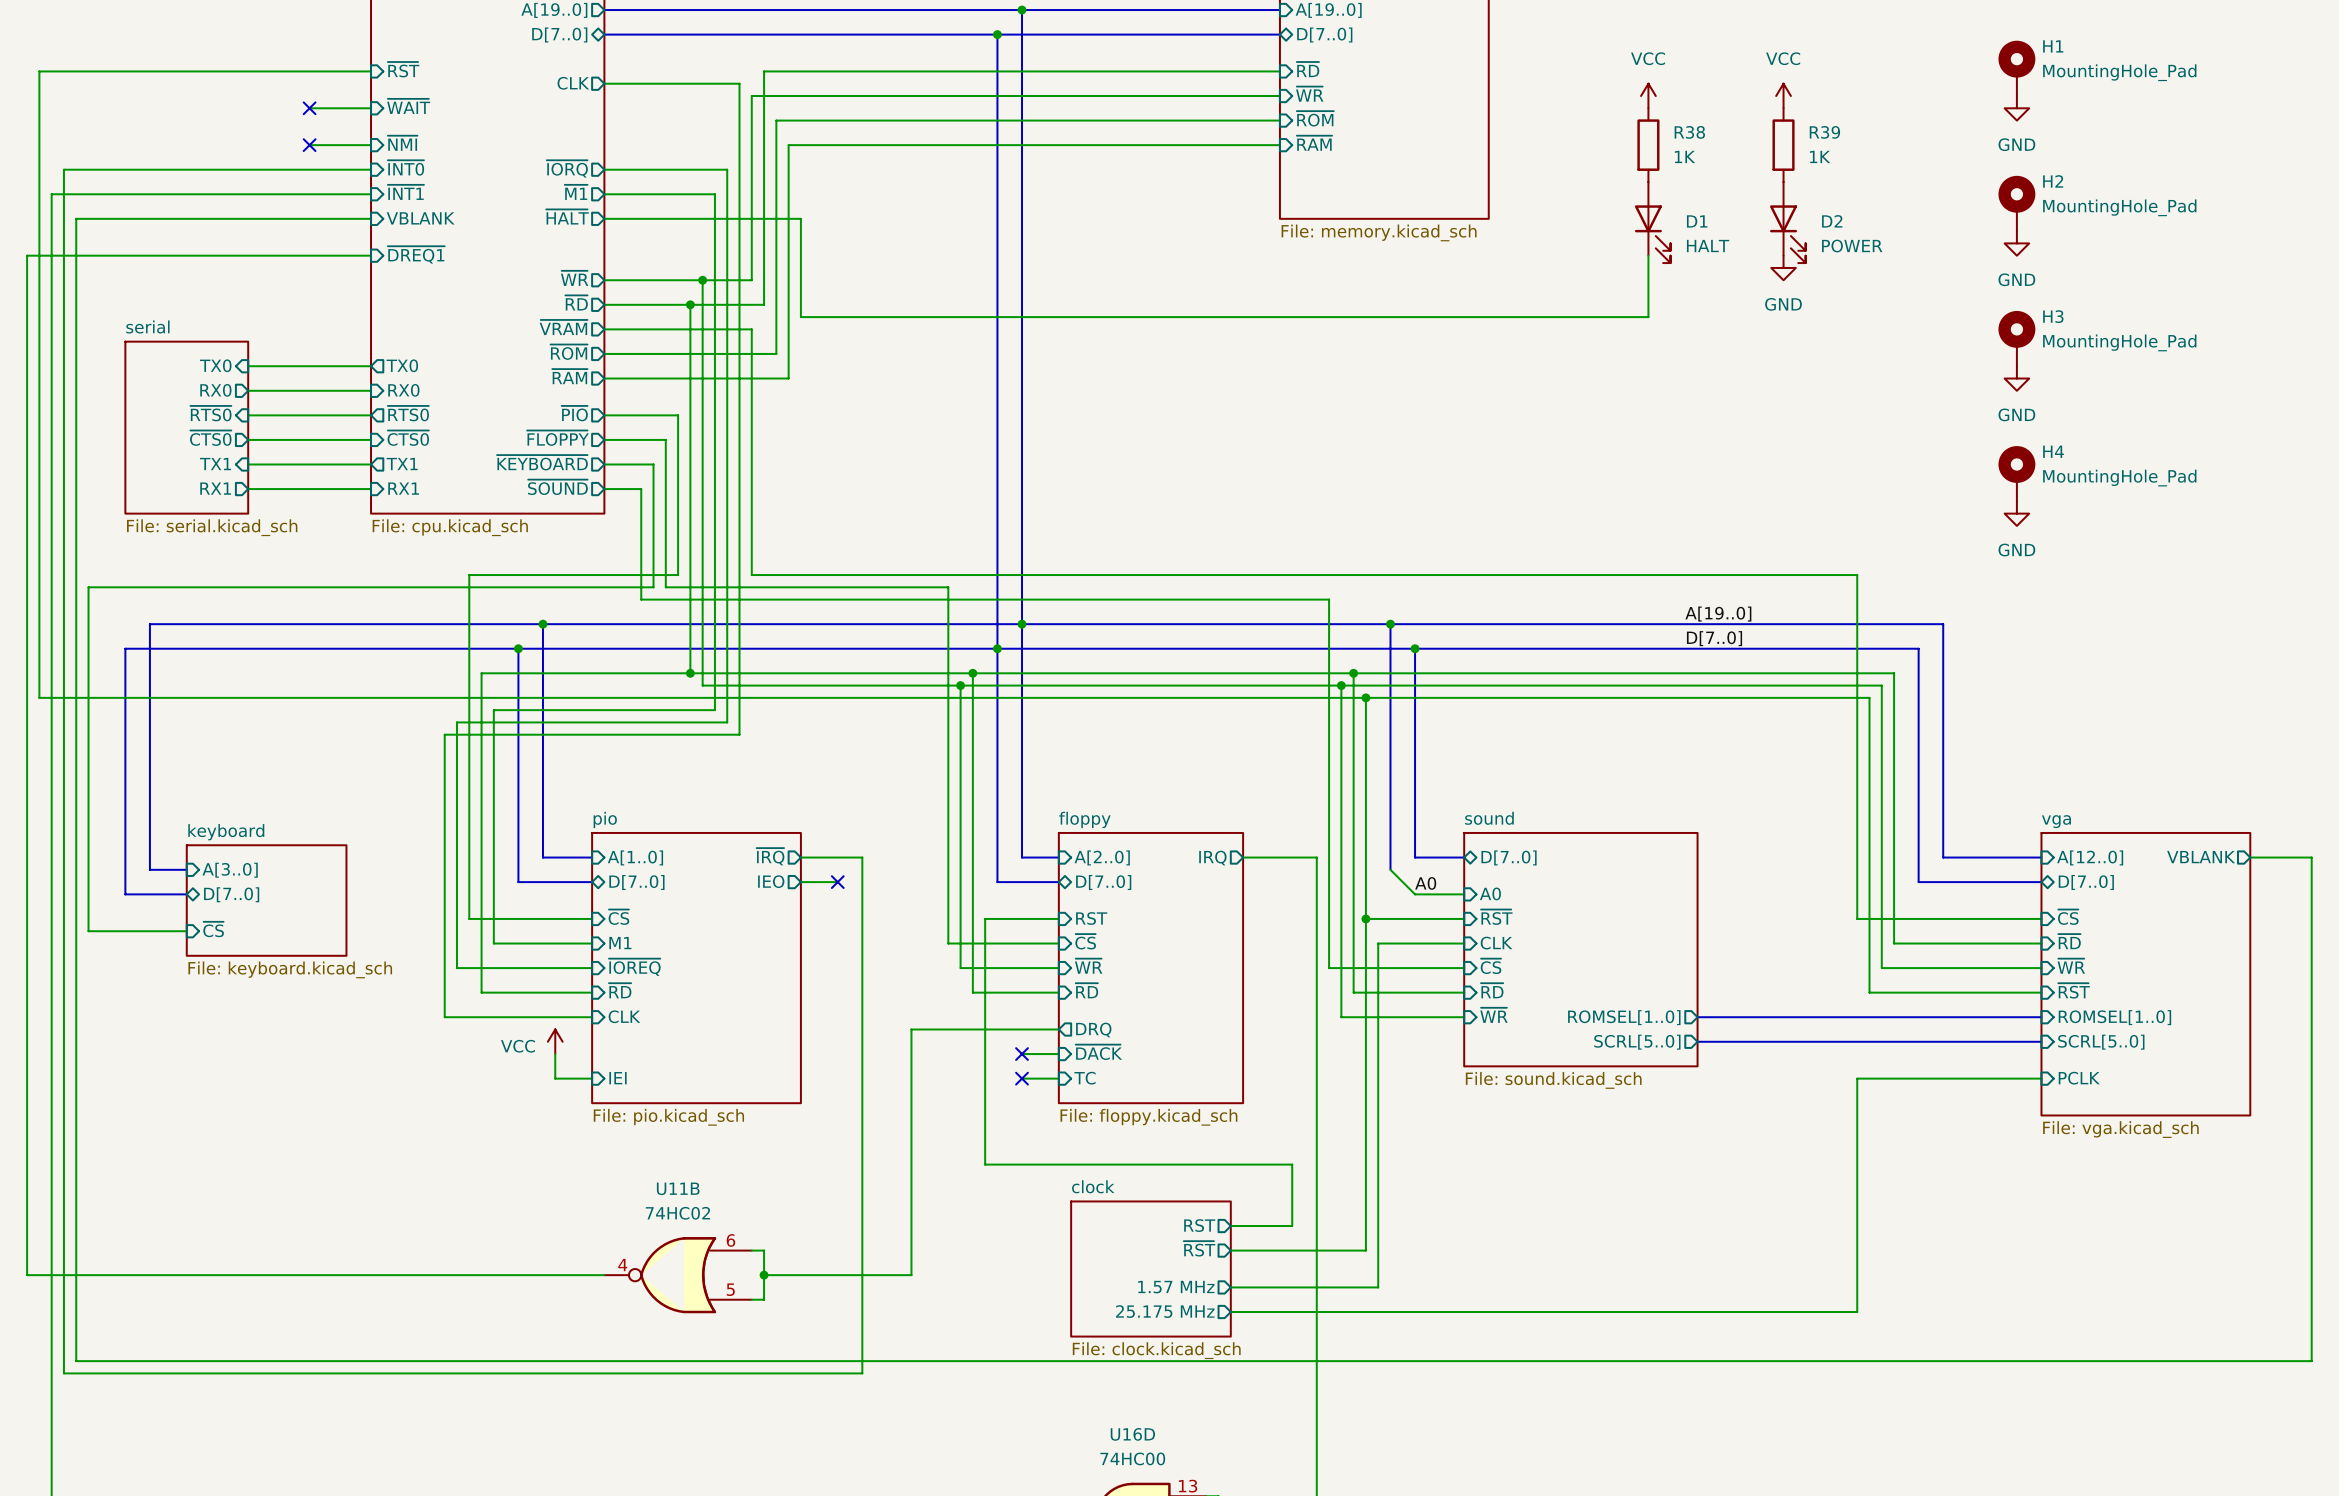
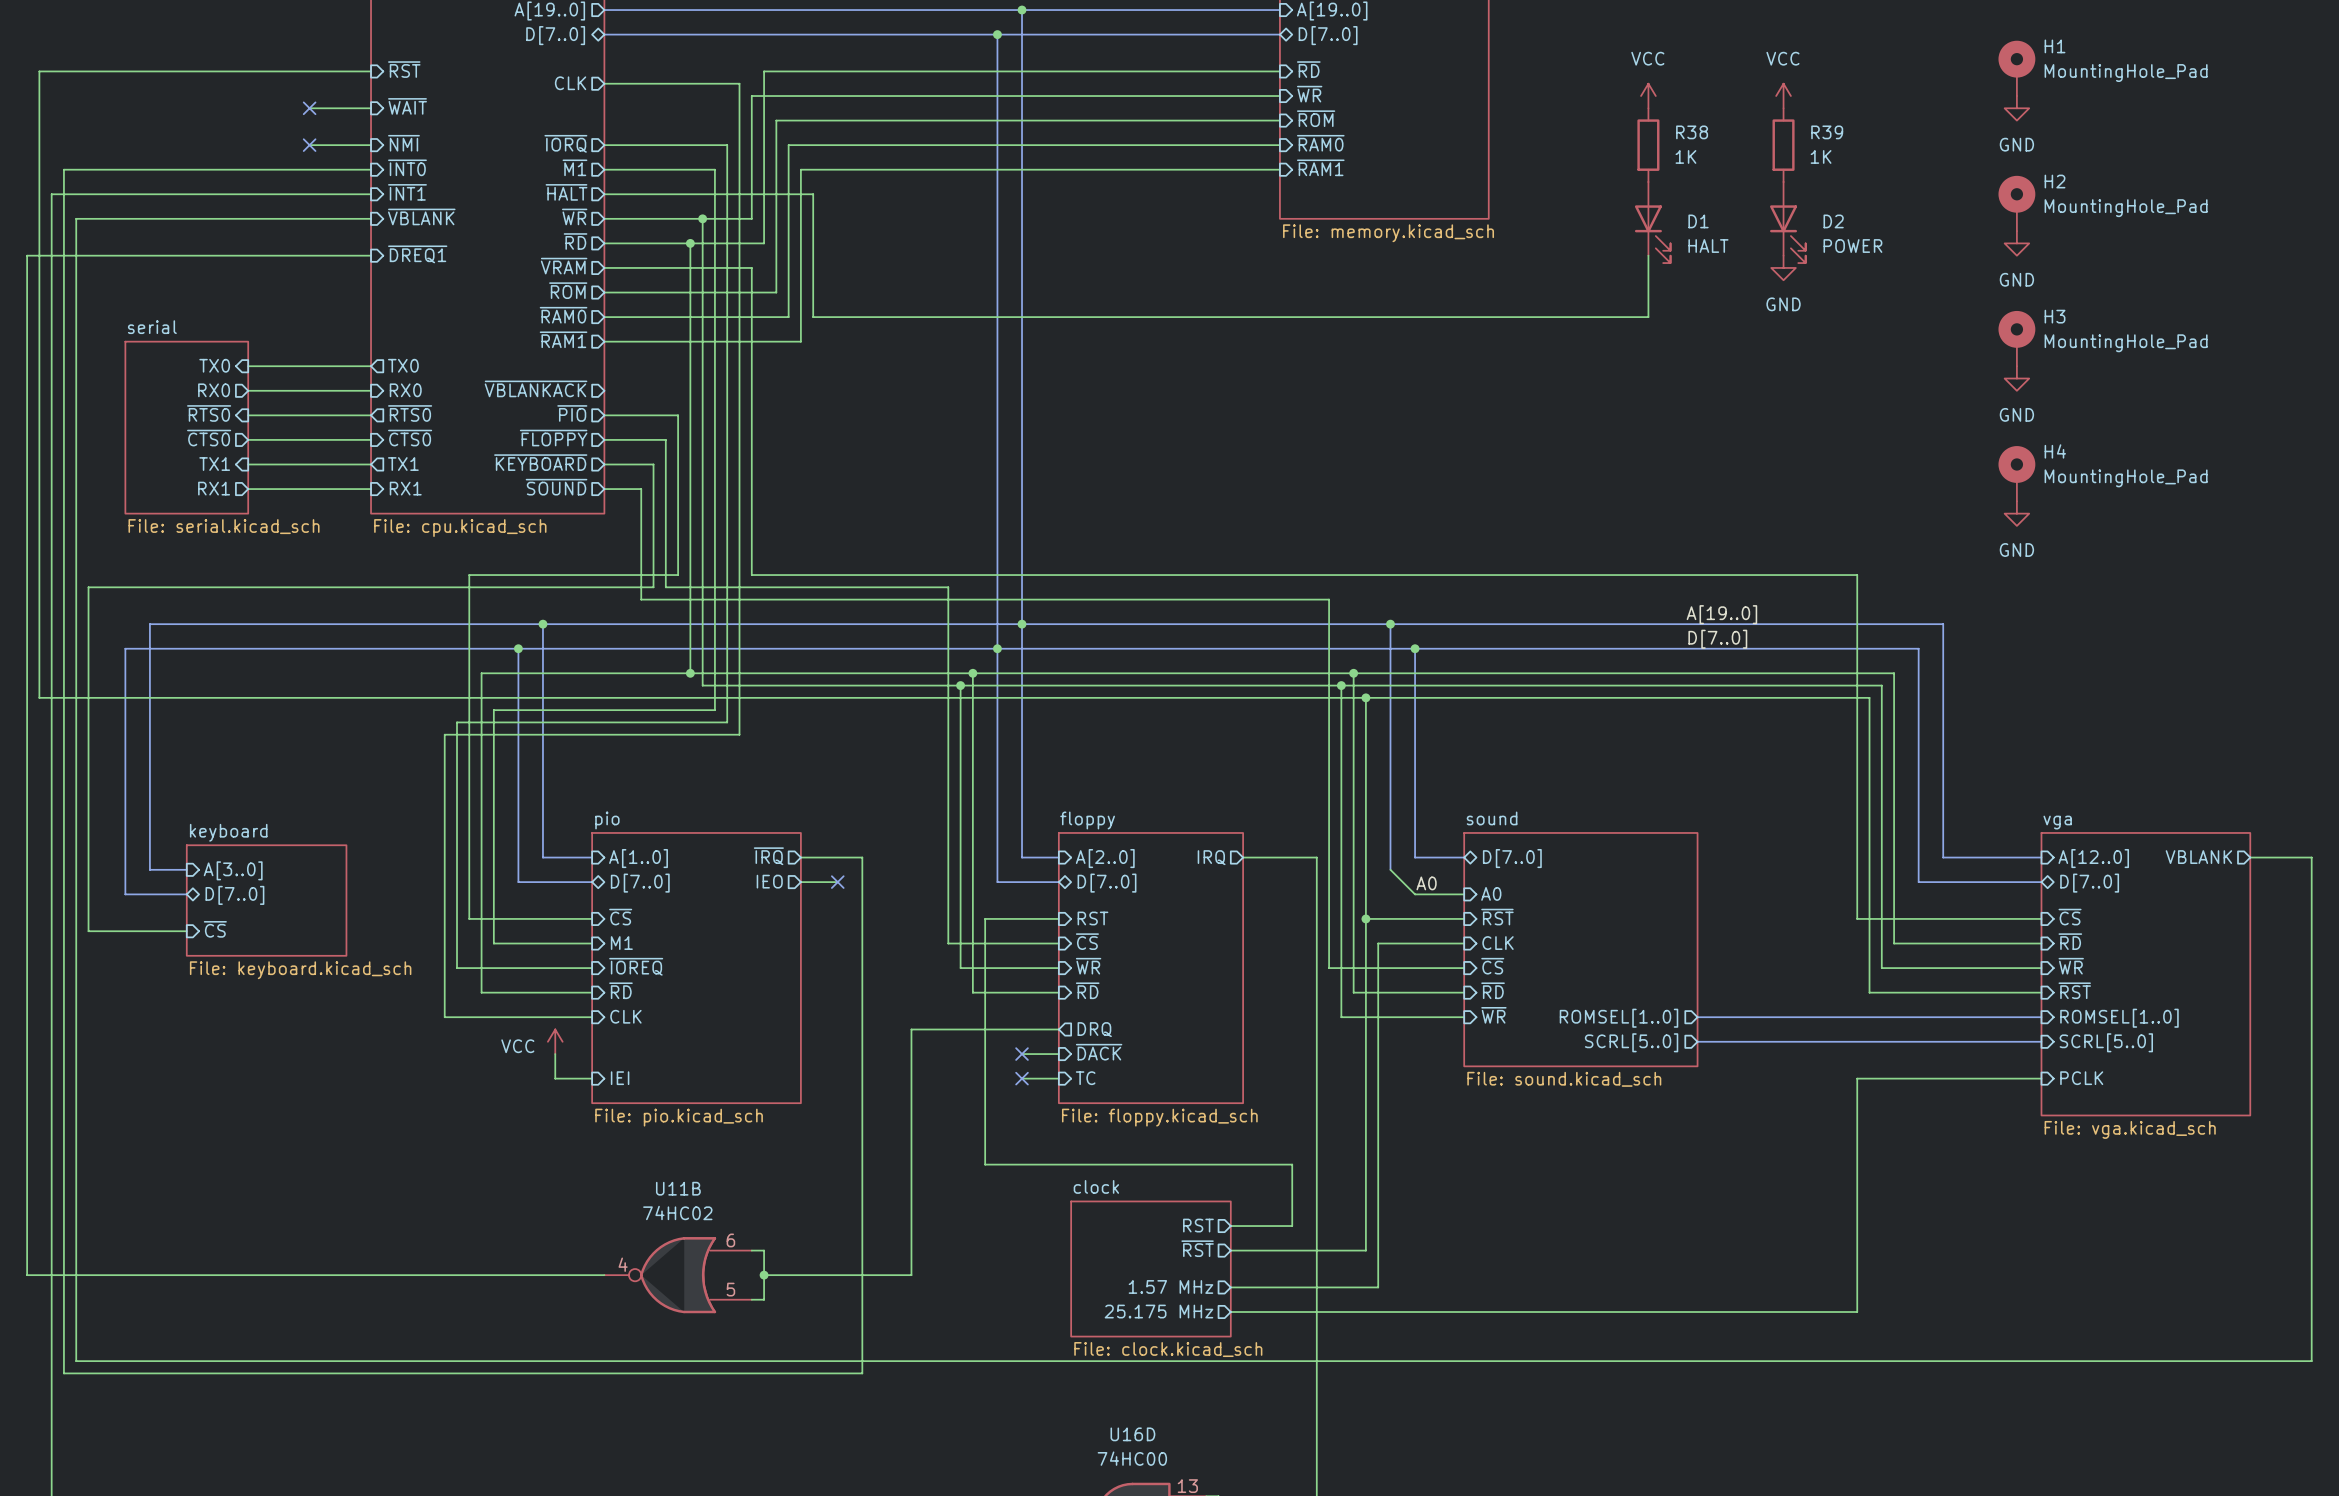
sheet pin: ~{RAM} (1314, 143) -> ~{RAM0} (1320, 143)
sheet pin: none -> ~{IORQ} (565, 143)
sheet pin: none -> ~{RAM1} (1320, 167)
sheet pin: ~{IORQ} (567, 168) -> ~{M1} (574, 167)
wire: (714, 169) (727, 169) -> (604, 145) (727, 145) (727, 169)
wire: none -> (1279, 169) (800, 169) (800, 218)
sheet pin: ~{M1} (576, 192) -> ~{HALT} (566, 192)
sheet pin: ~{HALT} (567, 216) -> ~{WR} (574, 216)
sheet pin: VBLANK (420, 218) -> ~{VBLANK} (421, 216)
wire: none -> (702, 218) (702, 280)
junction: none -> (702, 218)
wire: (800, 218) (751, 218) (751, 267) -> (604, 267) (751, 267)
wire: none -> (690, 243) (690, 304)
junction: none -> (690, 243)
wire: (764, 243) (764, 304) (604, 304) -> (764, 243) (604, 243)
sheet pin: ~{WR} (574, 278) -> none
wire: (604, 280) (751, 280) -> (751, 329) (751, 280)
junction: (702, 280) -> none
wire: (776, 292) (776, 353) (604, 353) -> (776, 292) (604, 292)
sheet pin position: ~{RD} (576, 302) -> ~{RD} (575, 241)
junction: (690, 304) -> none
sheet pin: none -> ~{RAM0} (563, 315)
wire: (788, 317) (788, 378) (604, 378) -> (788, 317) (604, 317)
wire: (800, 317) (813, 317) -> (714, 169) (714, 194) (813, 194) (813, 317)
wire: none -> (800, 317) (800, 341) (604, 341)
sheet pin position: ~{VRAM} (563, 327) -> ~{VRAM} (564, 266)
wire: (604, 329) (751, 329) -> none
sheet pin: none -> ~{RAM1} (563, 339)
sheet pin position: ~{ROM} (569, 352) -> ~{ROM} (568, 290)
sheet pin: ~{RAM} (569, 376) -> none
sheet pin: none -> ~{VBLANKACK} (536, 388)

